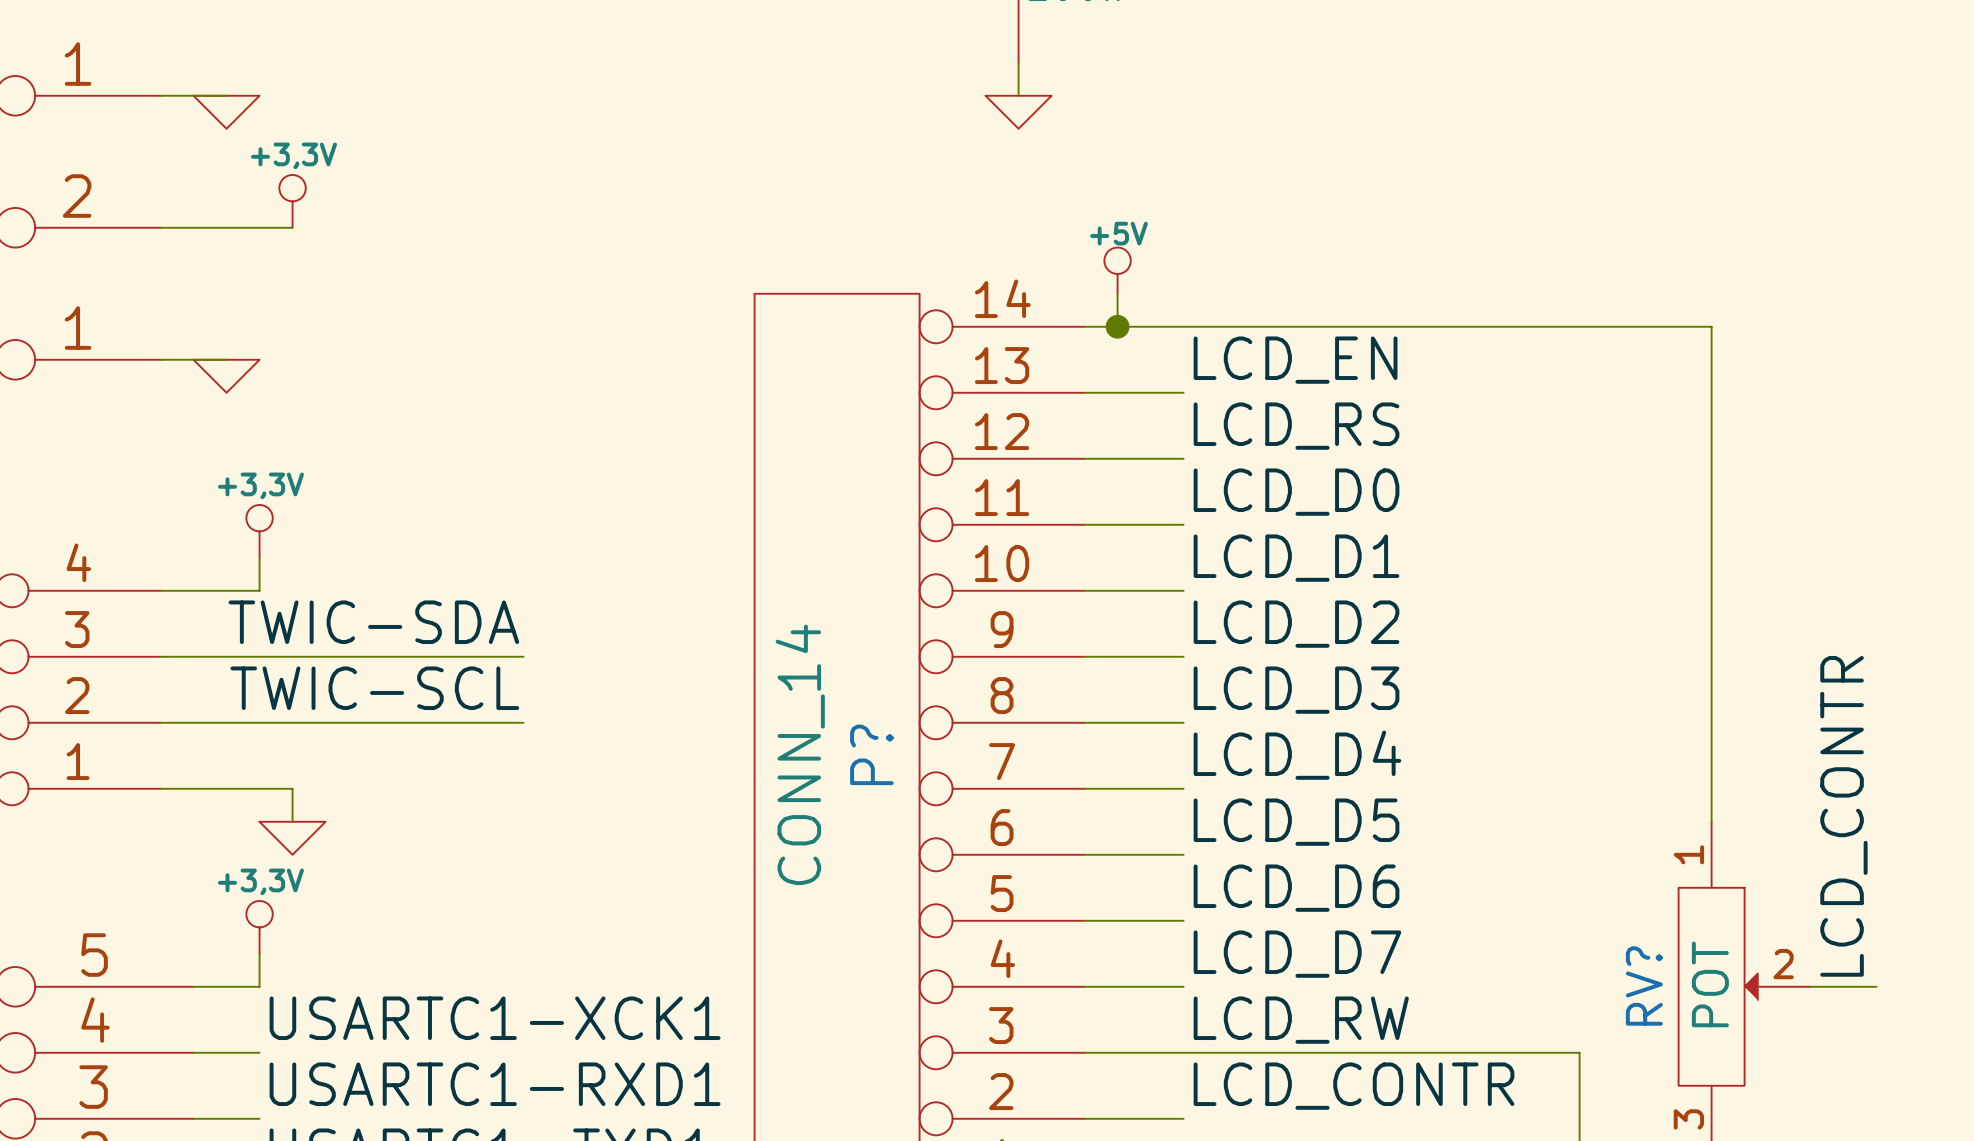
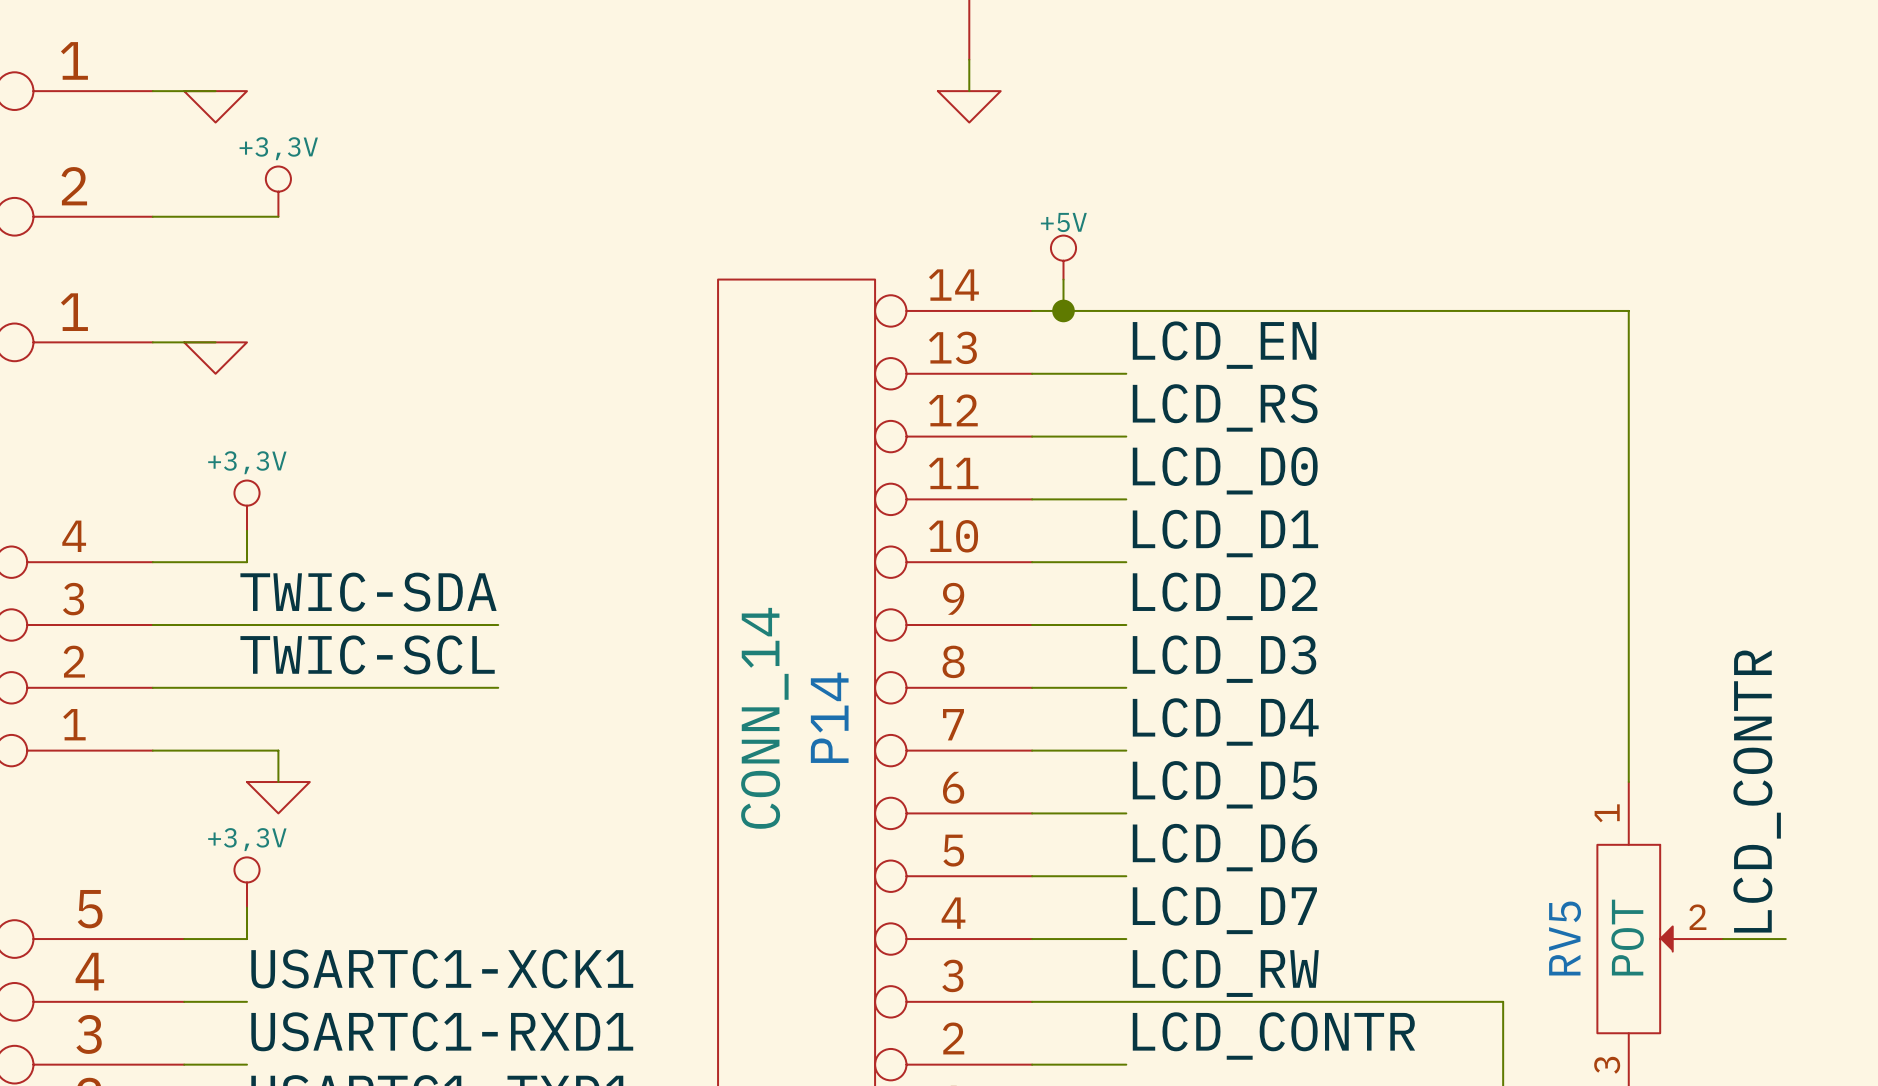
P? name: P? (871, 754) -> P14 (829, 717)
RV? name: RV? (1644, 986) -> RV5 (1565, 938)

